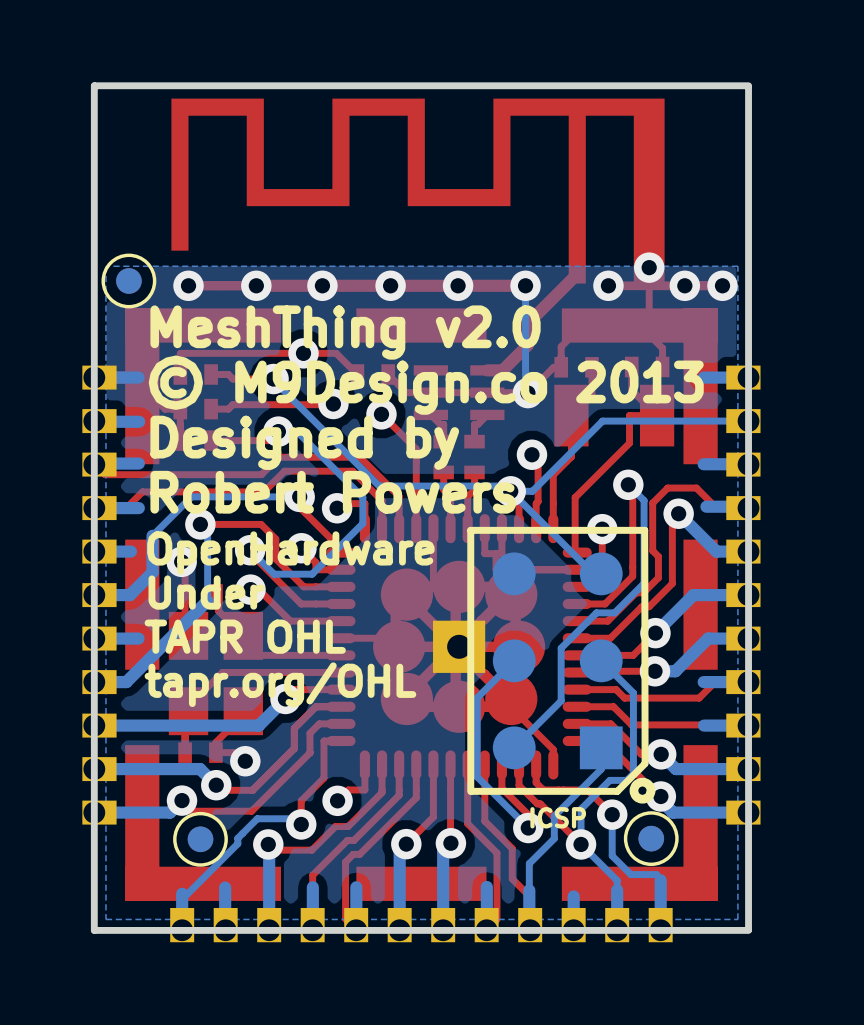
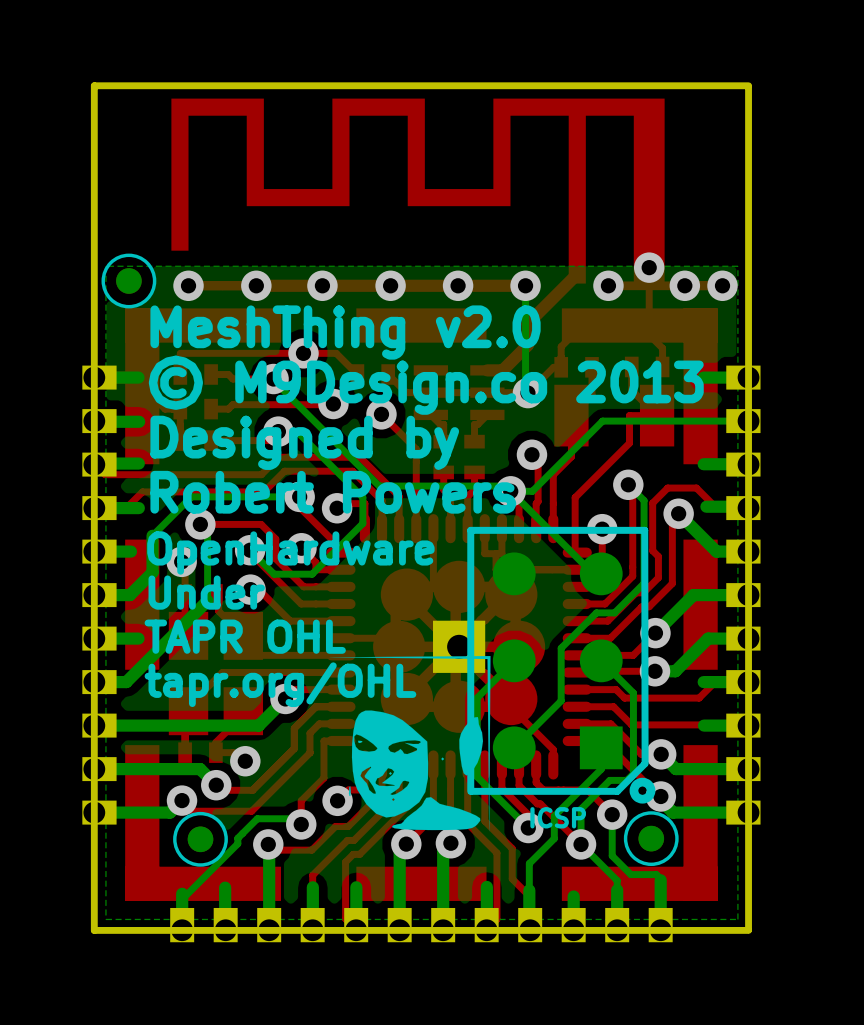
drawing: none -> [329, 656, 491, 832]

